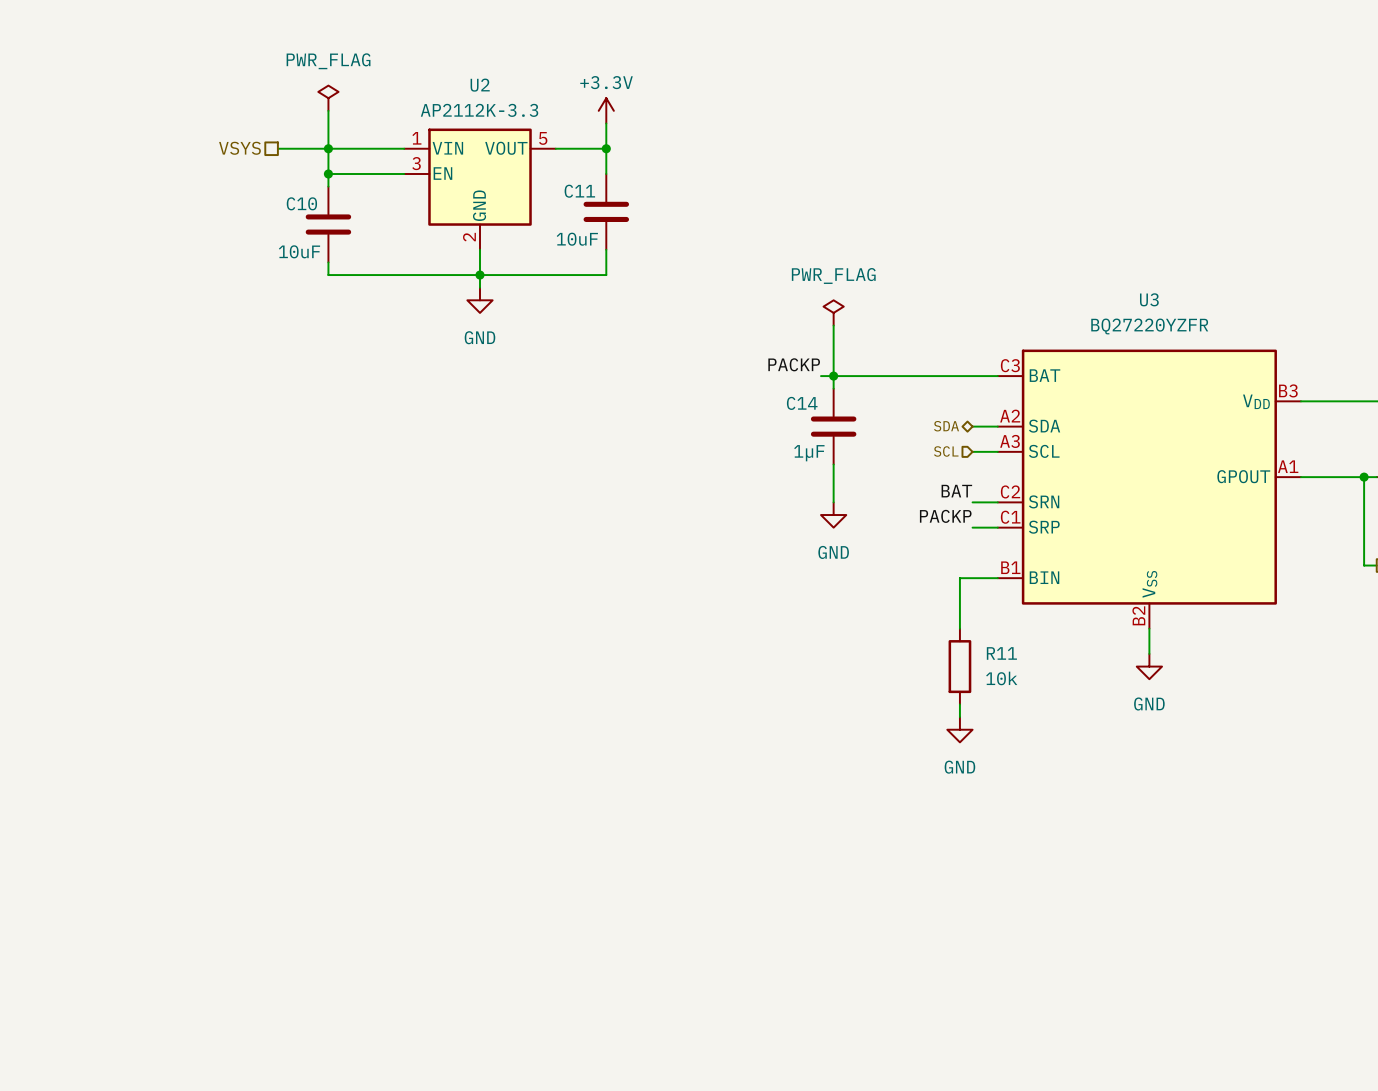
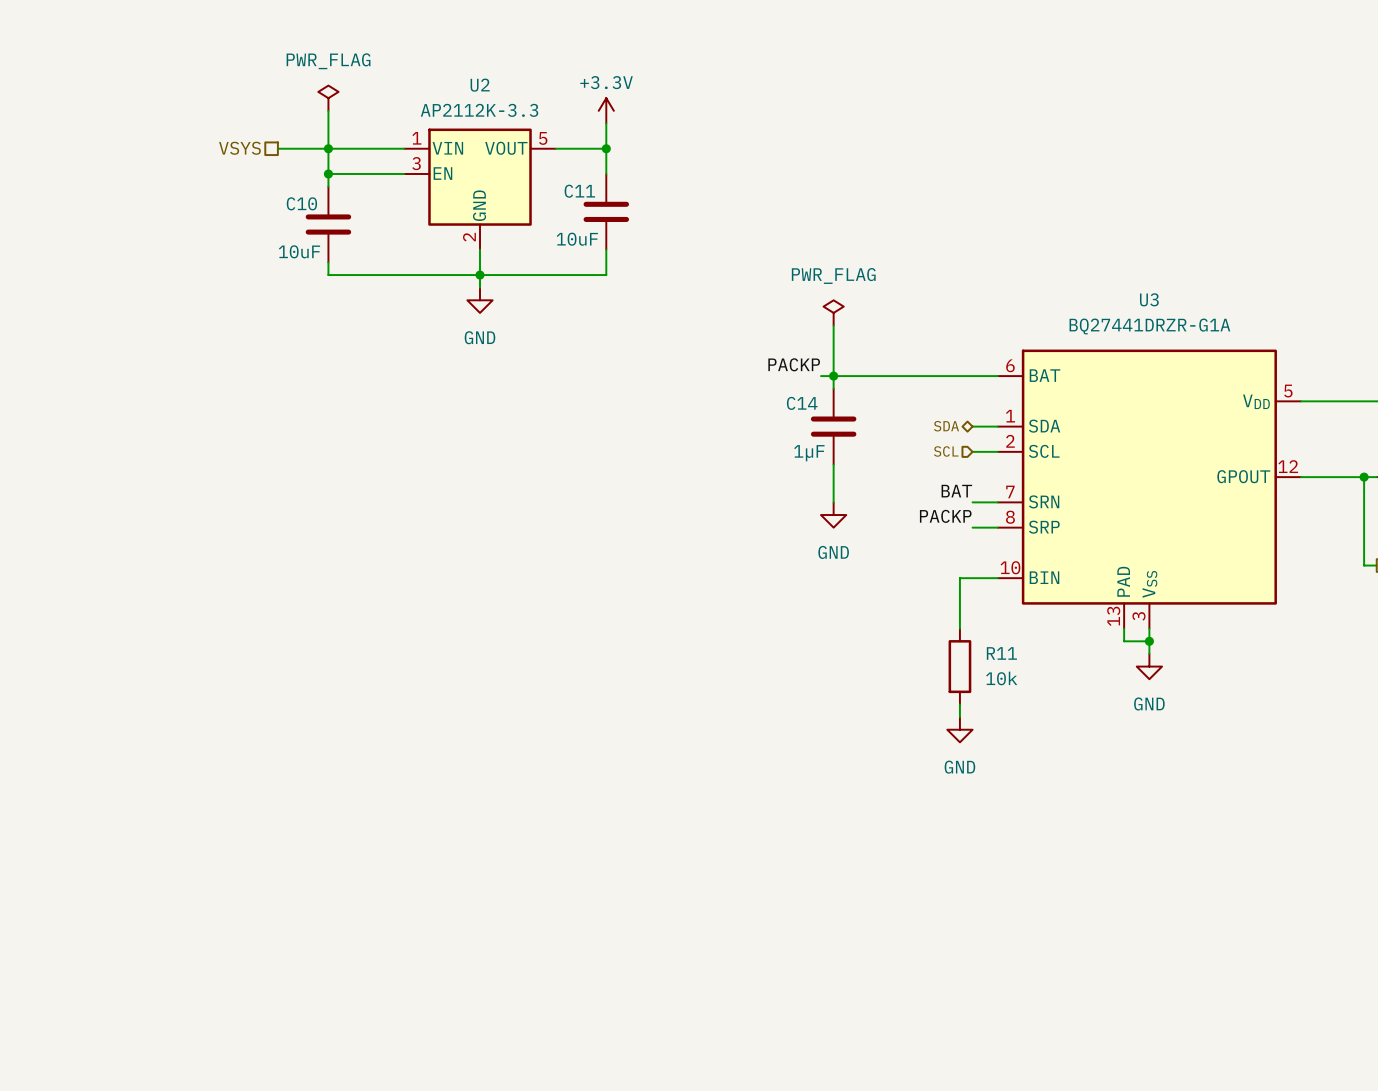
U3 value: BQ27220YZFR (1149, 326) -> BQ27441DRZR-G1A (1149, 326)
U3 symbol: [997, 349, 1301, 629] -> [997, 349, 1301, 629]
wire: none -> (1124, 628) (1124, 641) (1149, 641)
junction: none -> (1149, 641)

